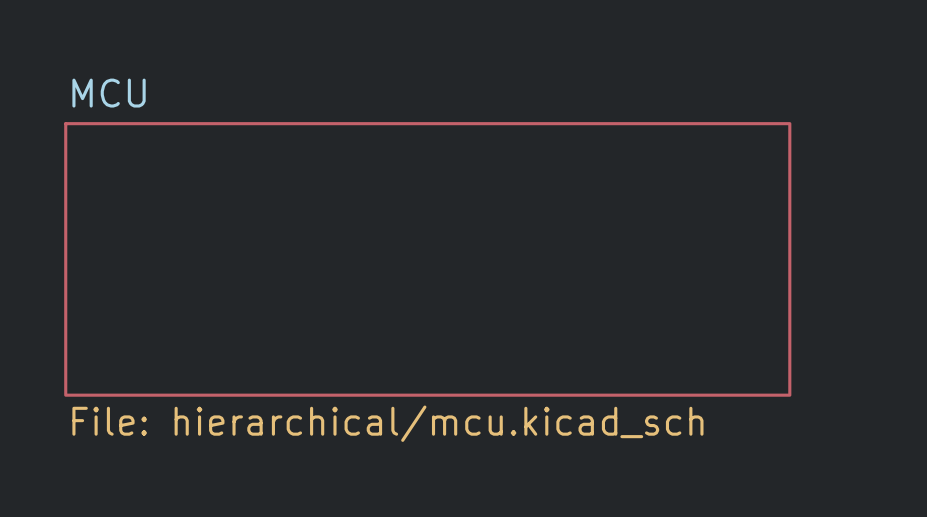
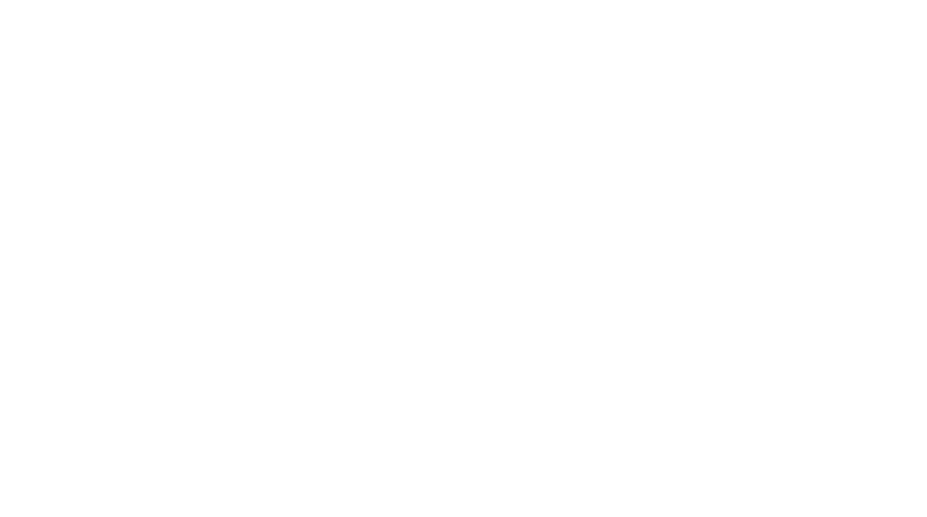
sheet MCU: File: hierarchical/mcu.kicad_sch (427, 259) -> none

